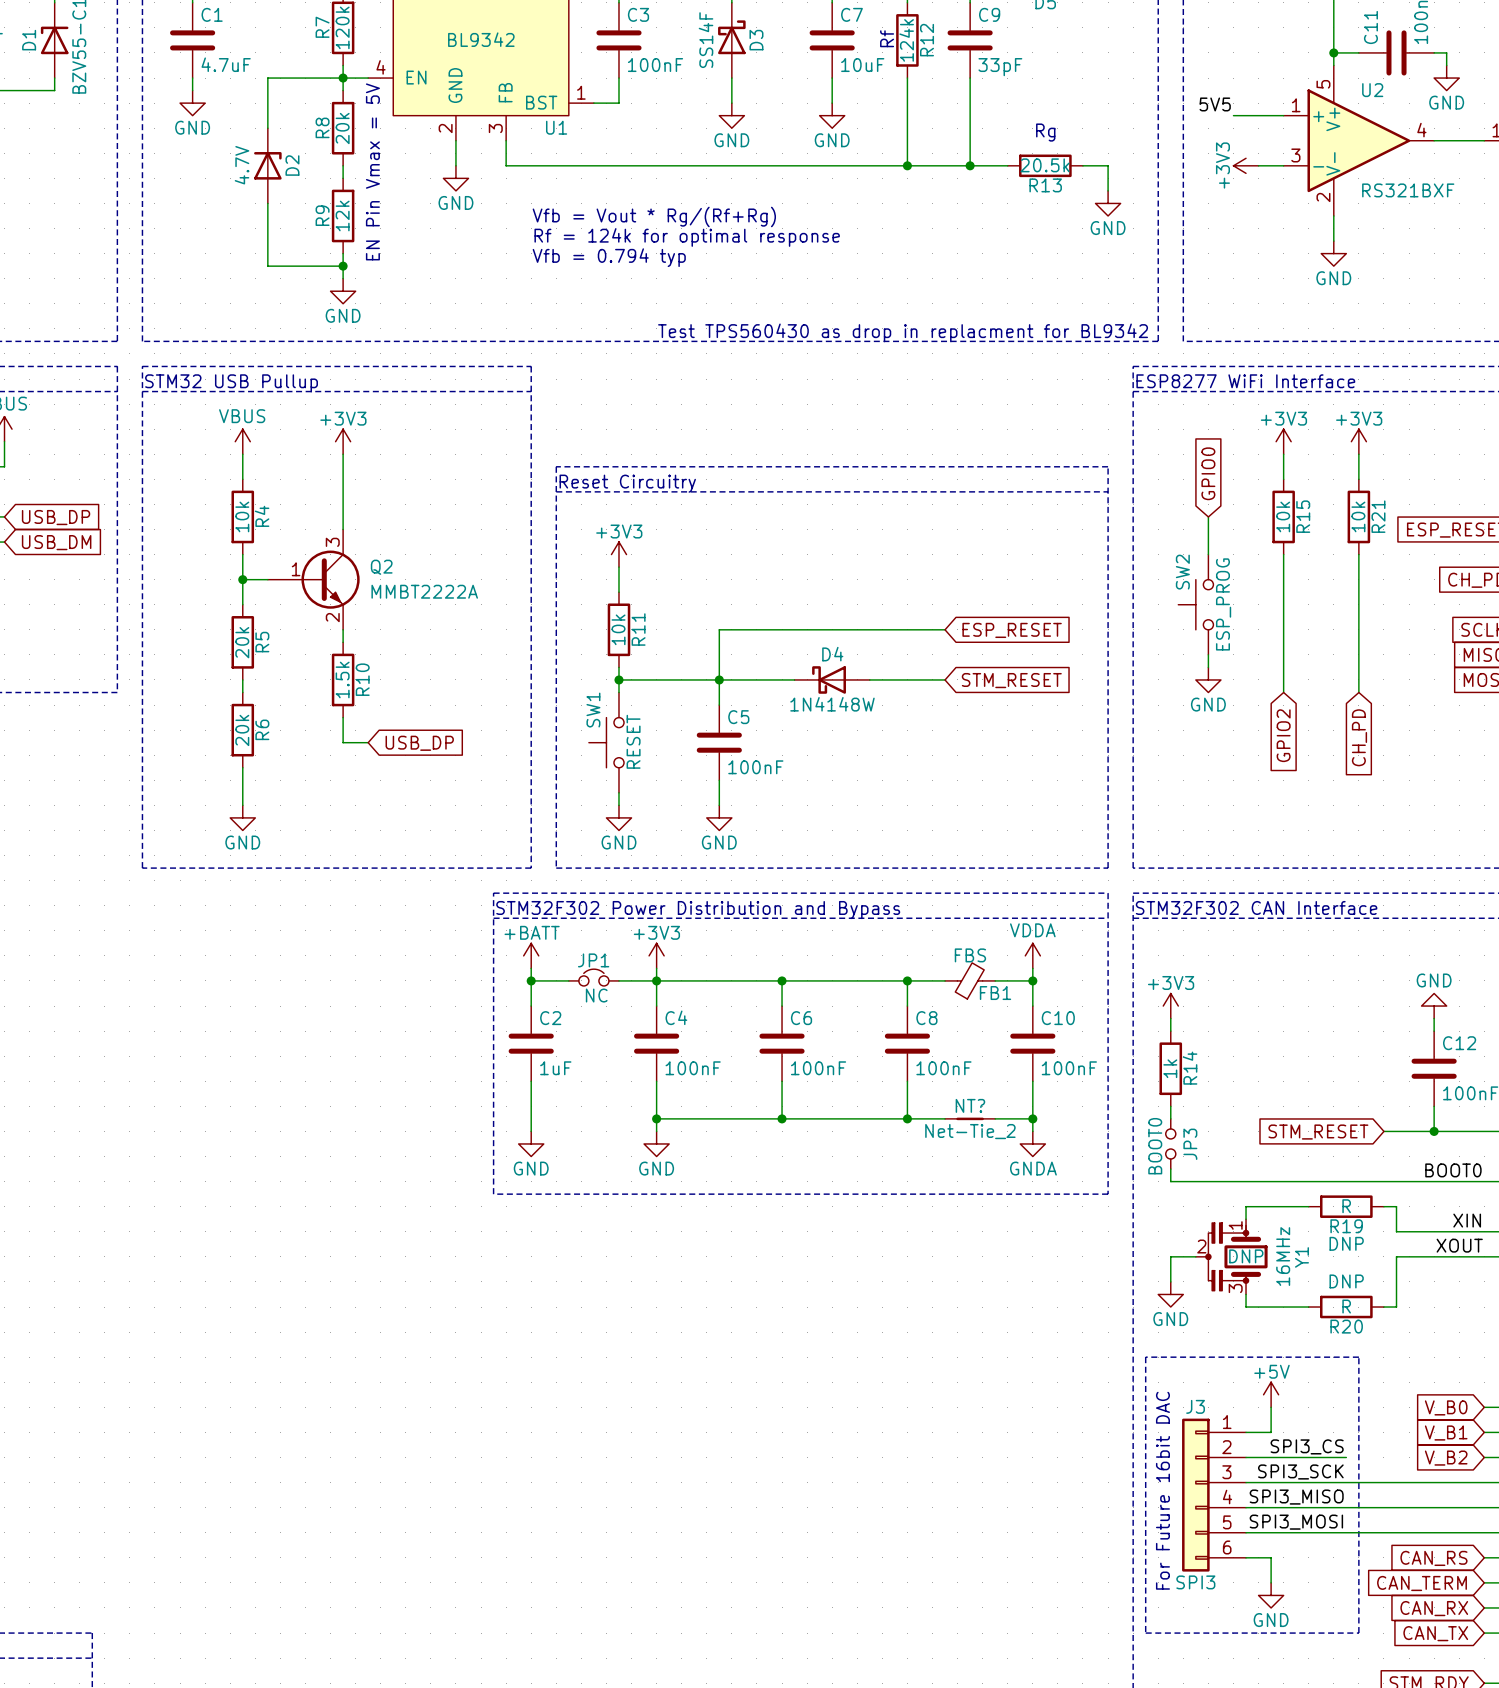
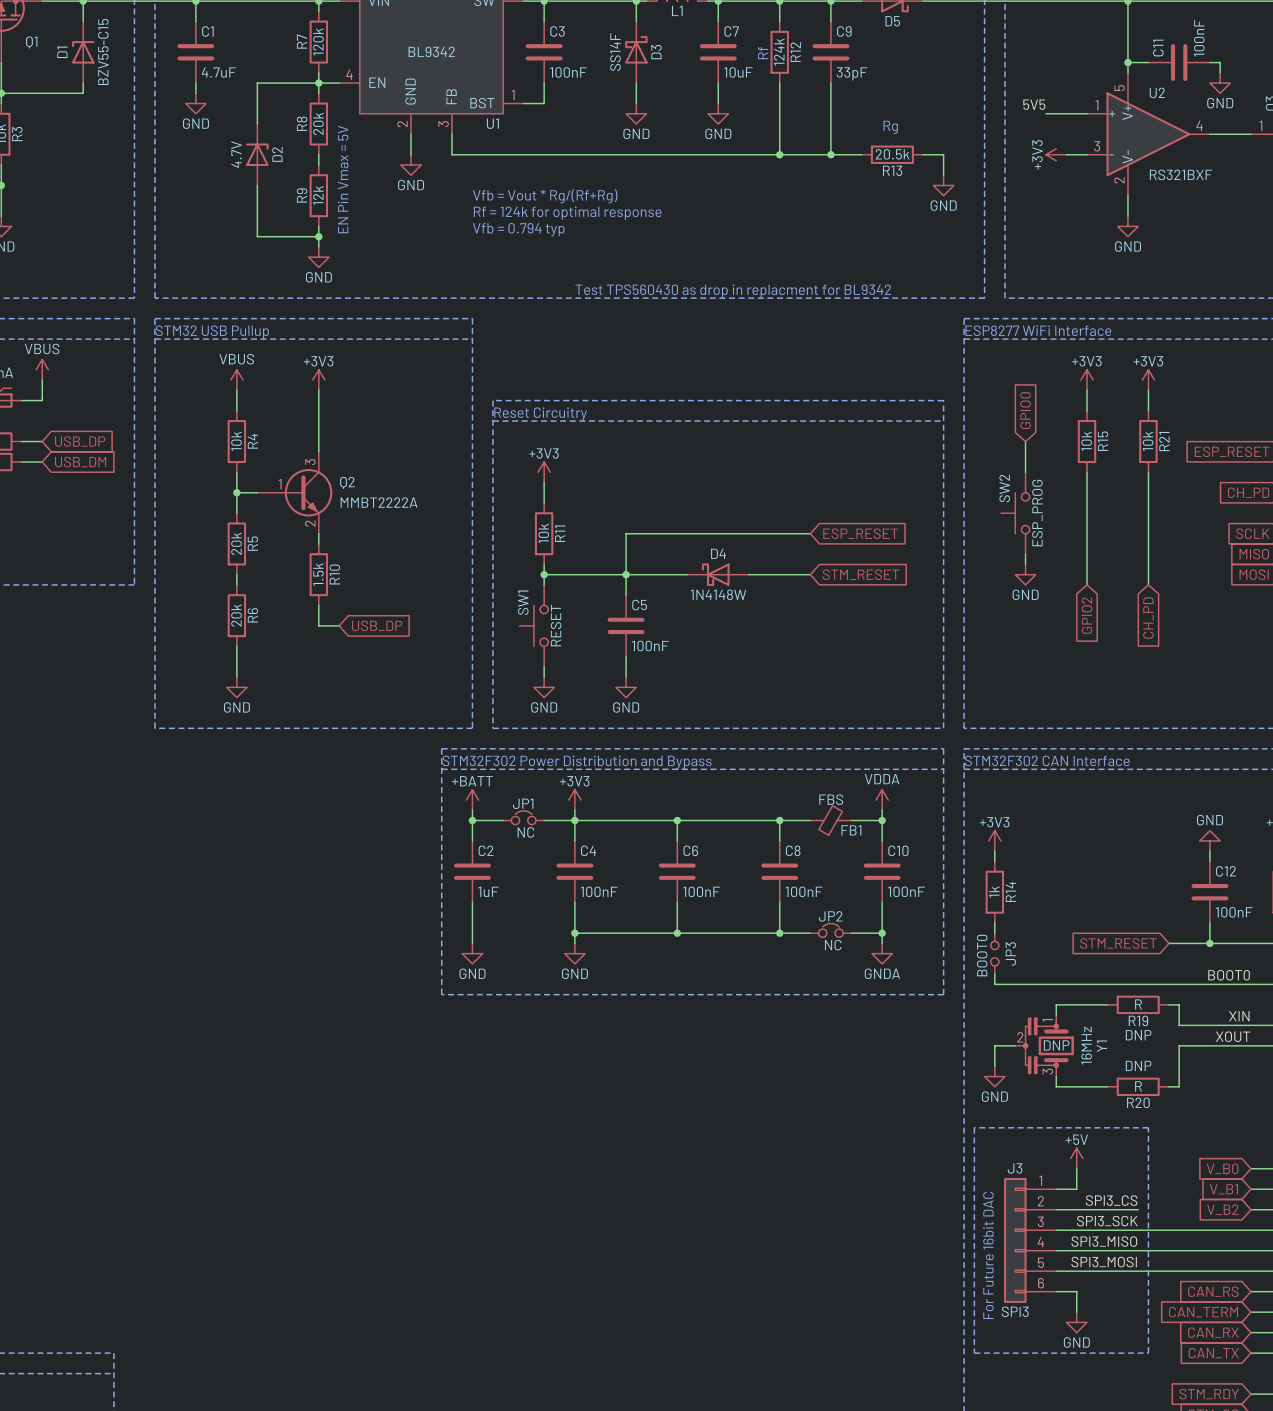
JP2: none -> NC (830, 930)
NT?: Net-Tie_2 (970, 1118) -> none

